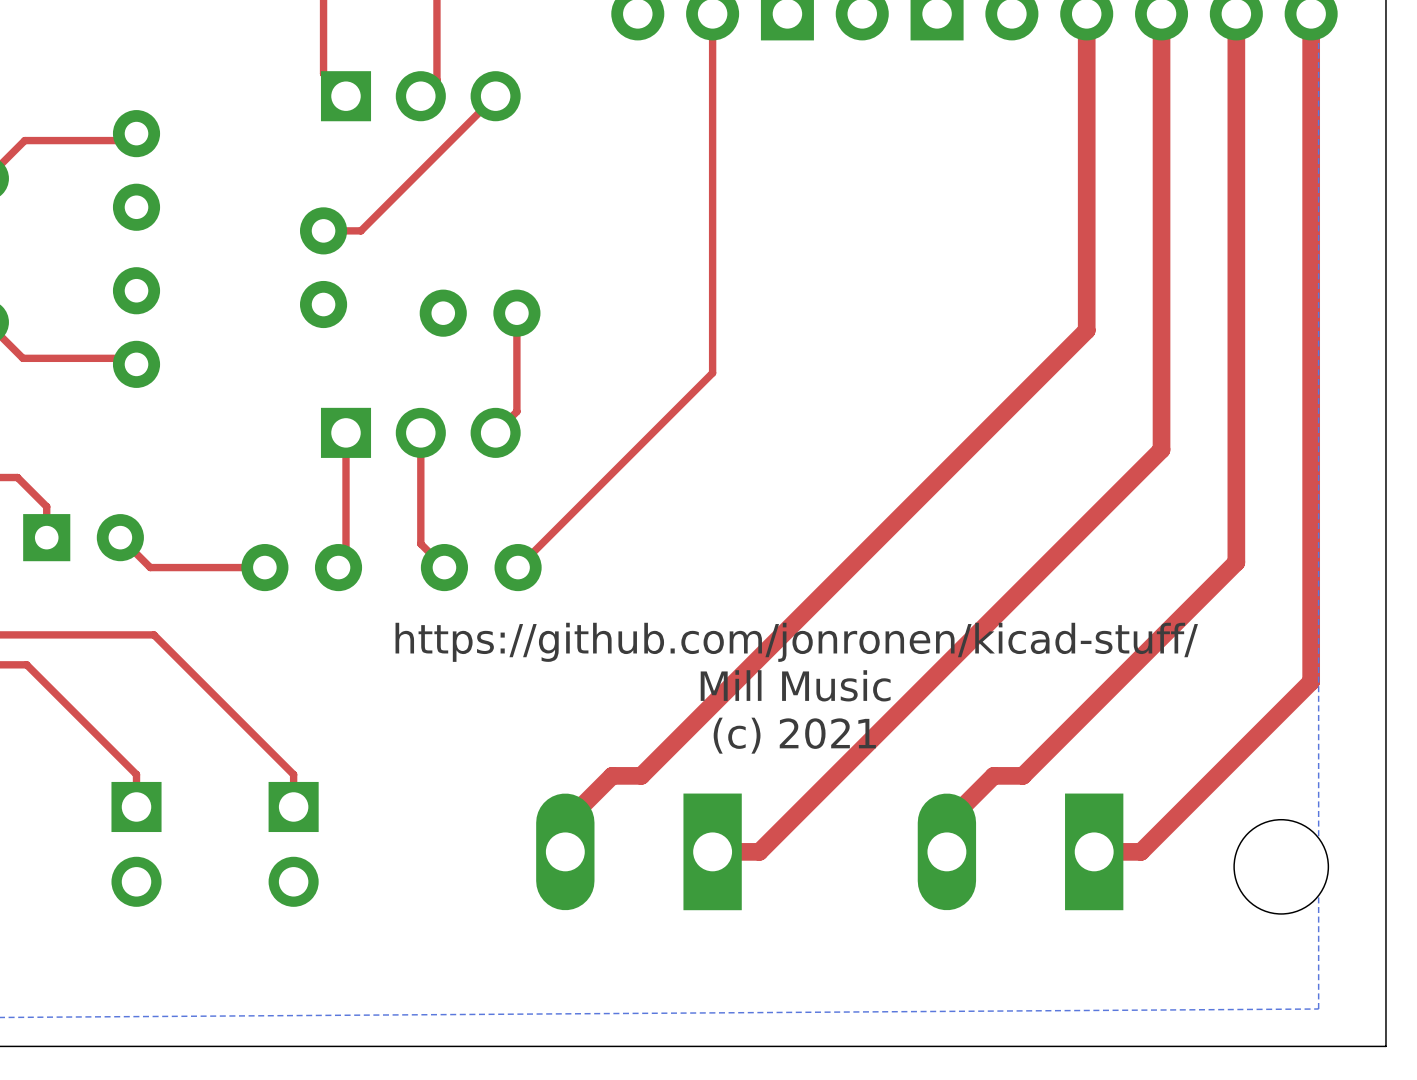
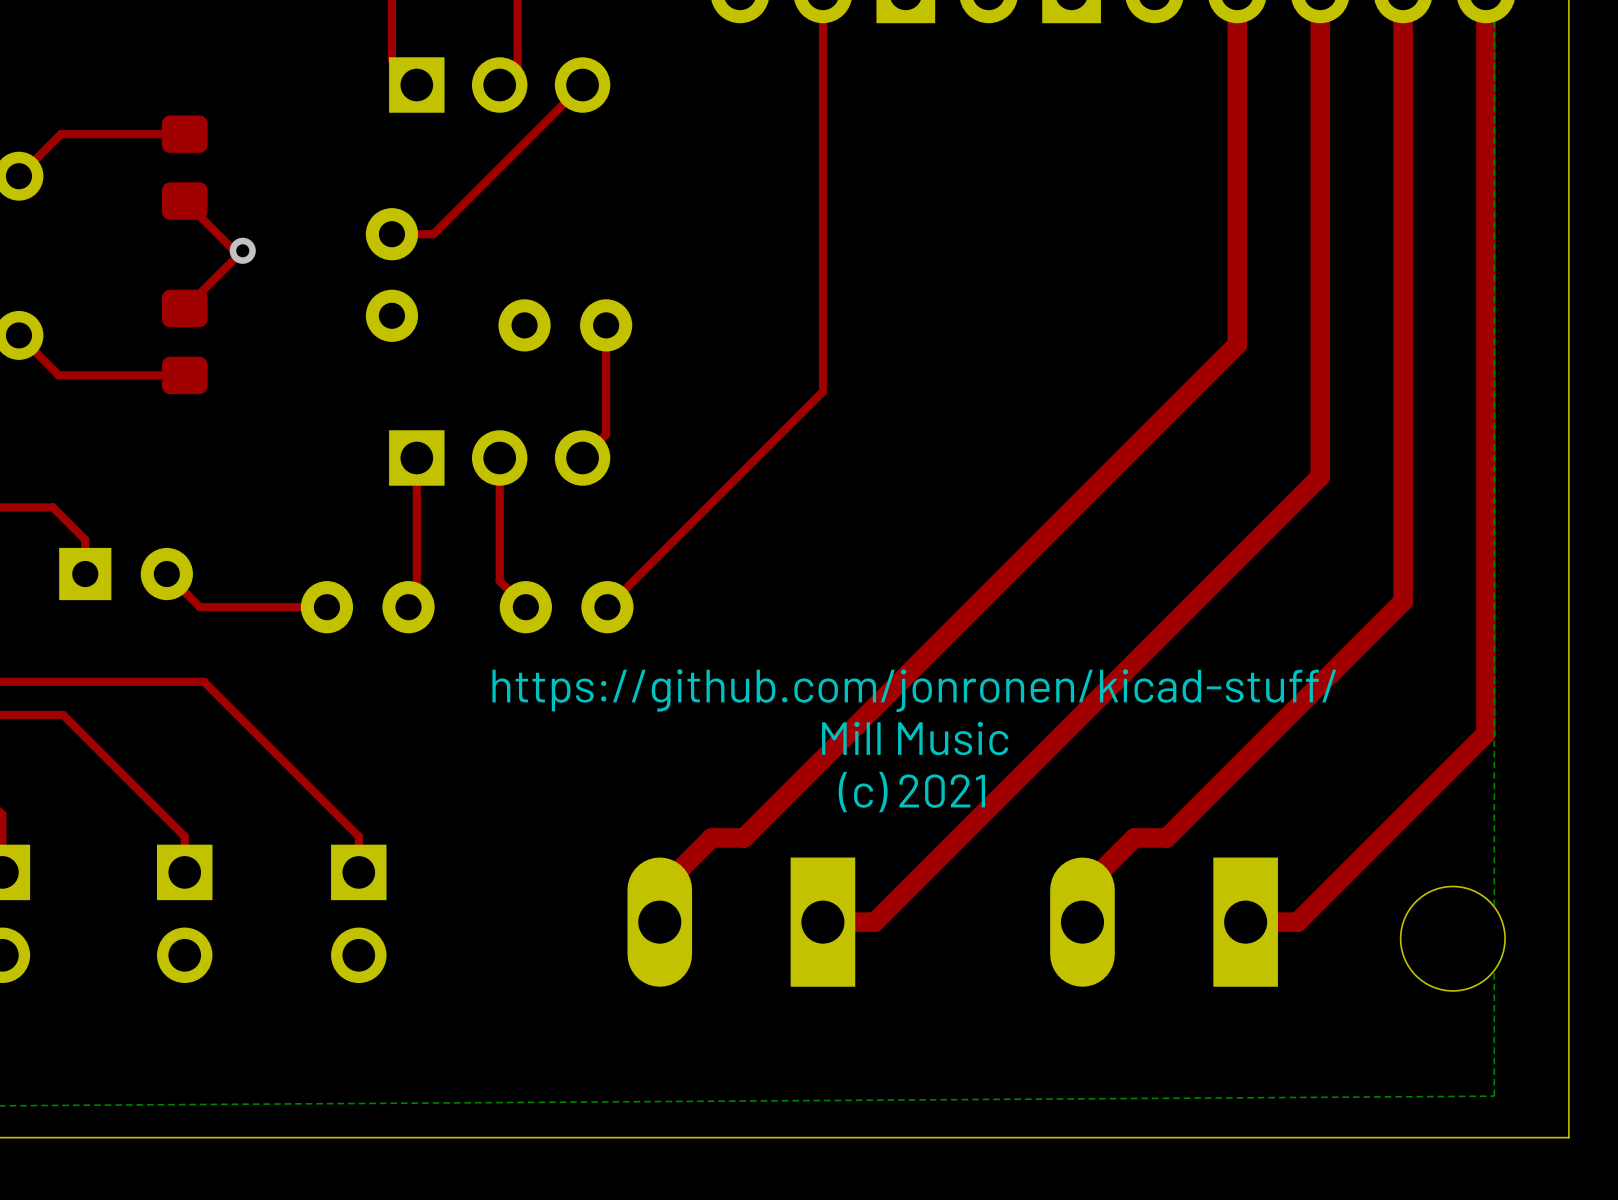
part footprint: [112, 110, 161, 231] -> [161, 115, 208, 220]
top track: none -> (184, 201) (234, 250) (242, 250) (185, 308)
via: none -> (242, 250)
part footprint: [112, 267, 161, 388] -> [161, 289, 208, 395]

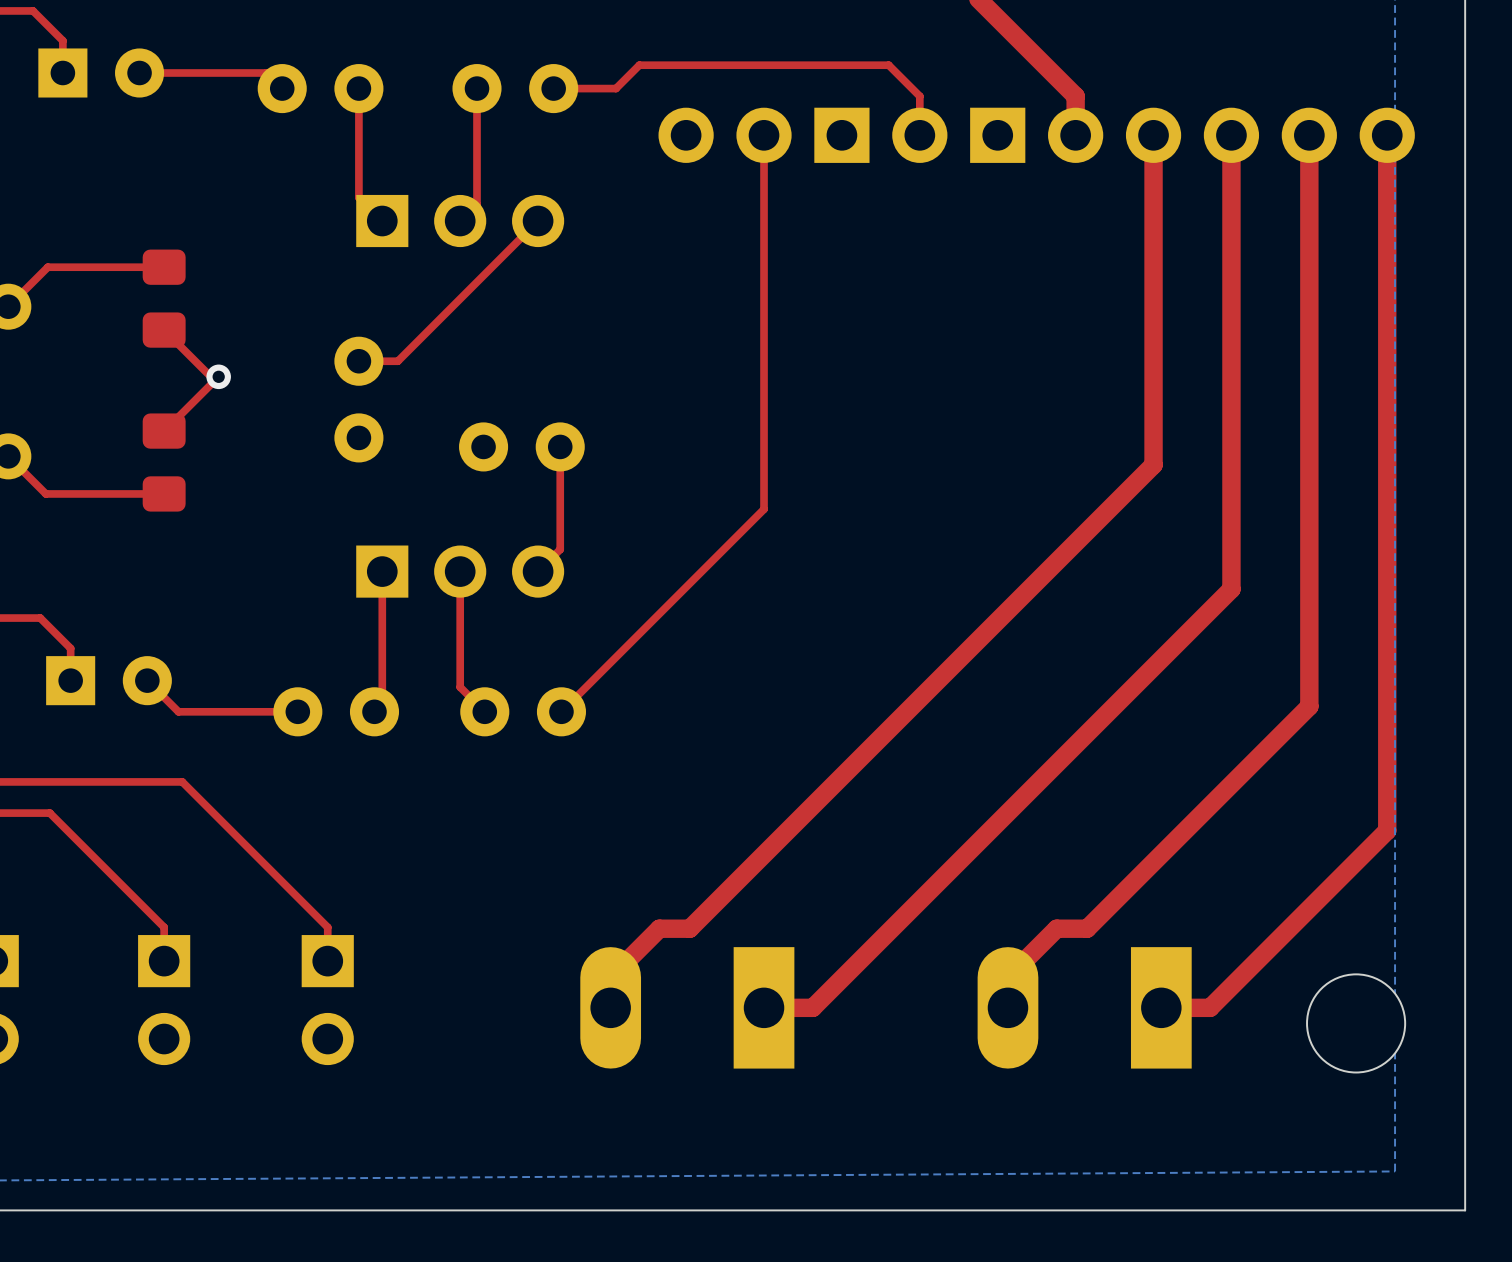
text: https://github.com/jonronen/kicad-stuff/ (914, 690) -> none
text: Mill Music (915, 738) -> none
text: (c) 2021 (911, 792) -> none

